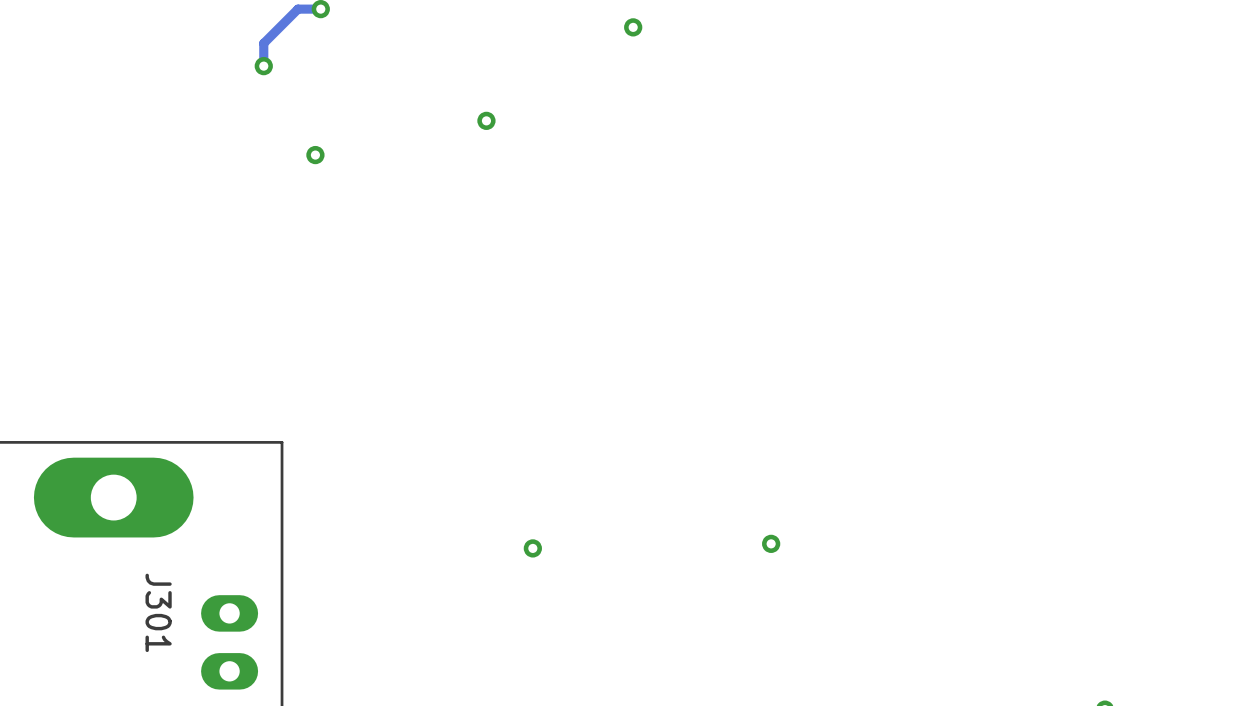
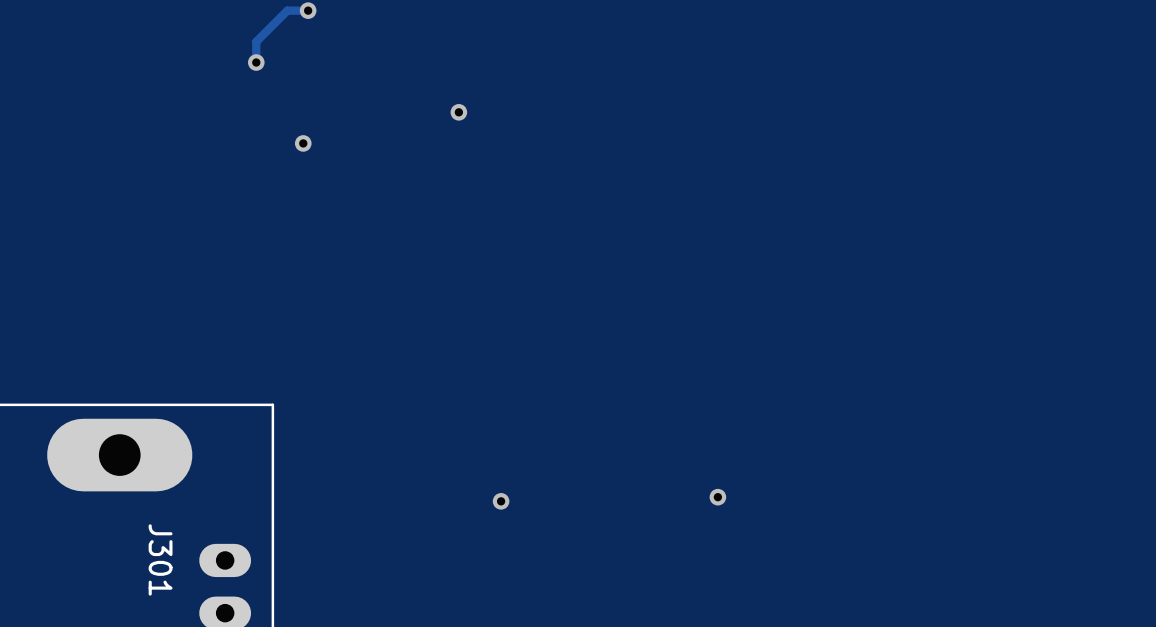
via: (633, 27) -> none

